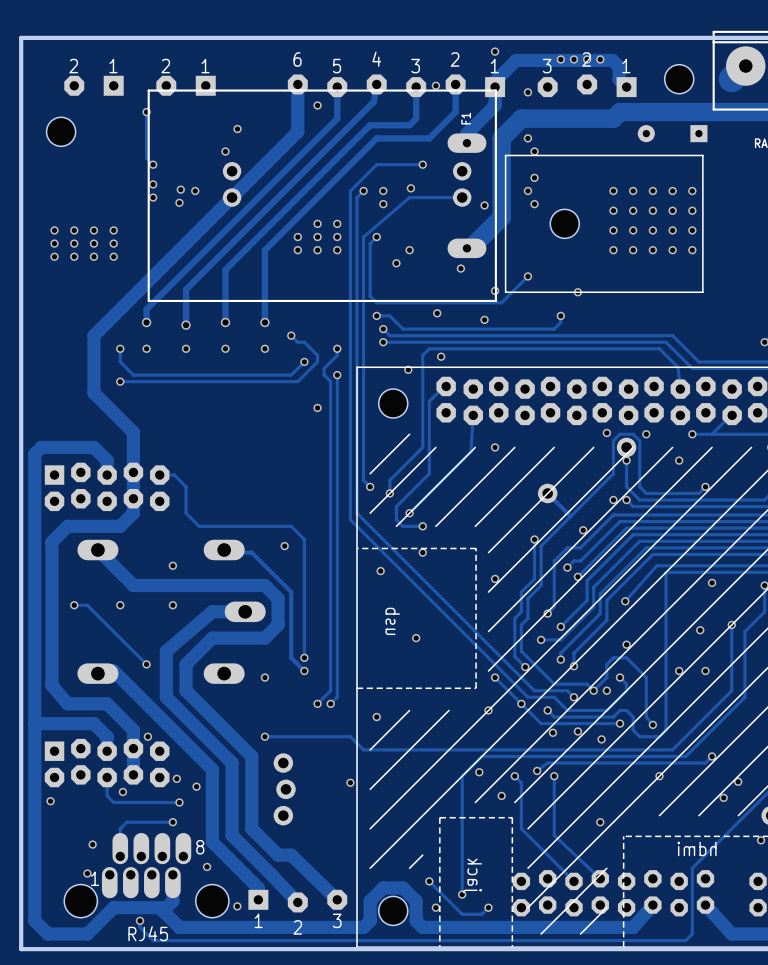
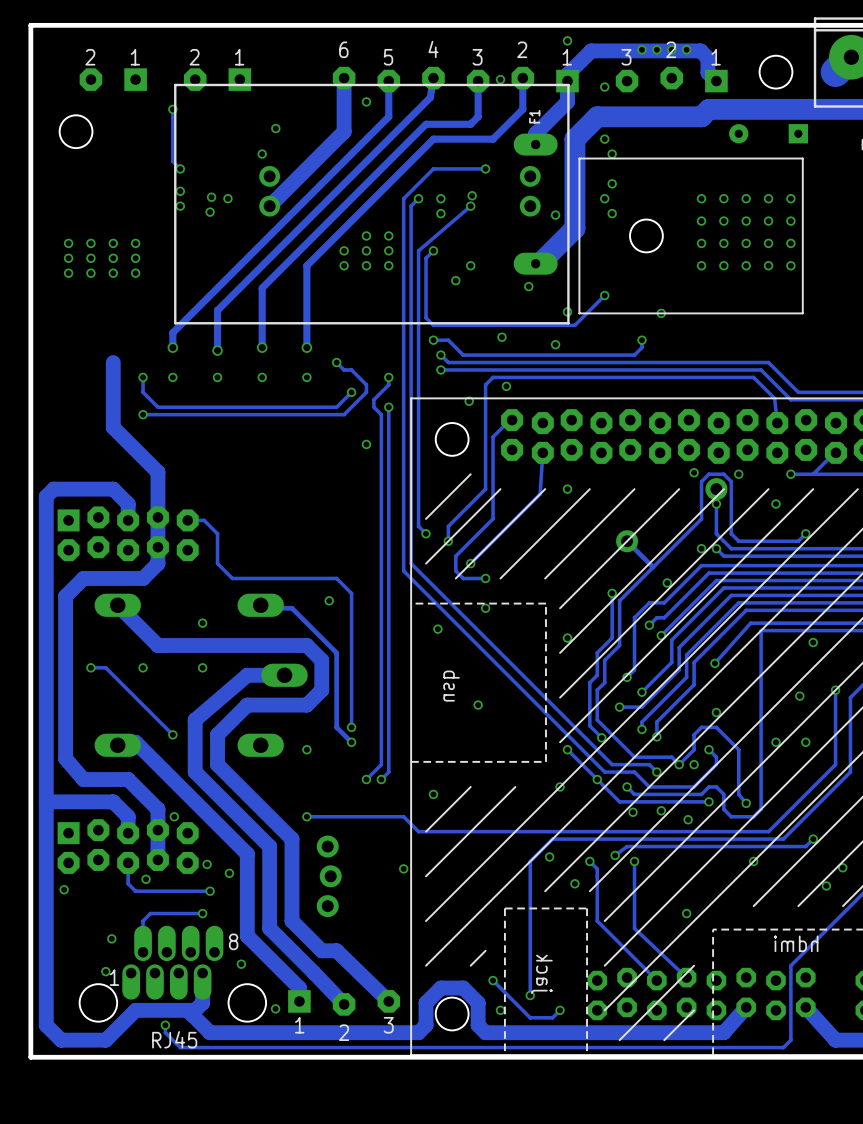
track: (232, 197) (93, 335) -> none
via: none -> (470, 206)
track: (462, 197) (409, 197) -> none

